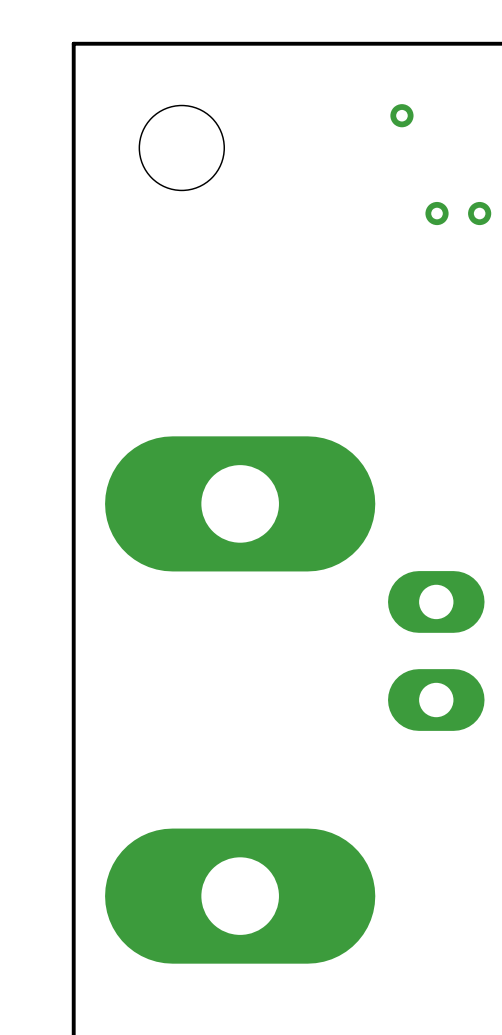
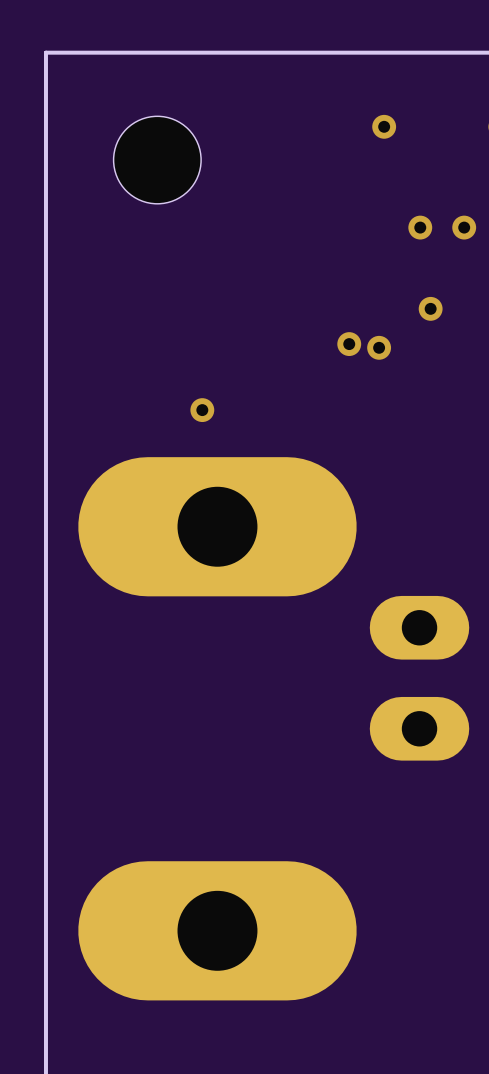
via: none -> (430, 308)
via: none -> (349, 344)
via: none -> (379, 347)
via: none -> (202, 410)

